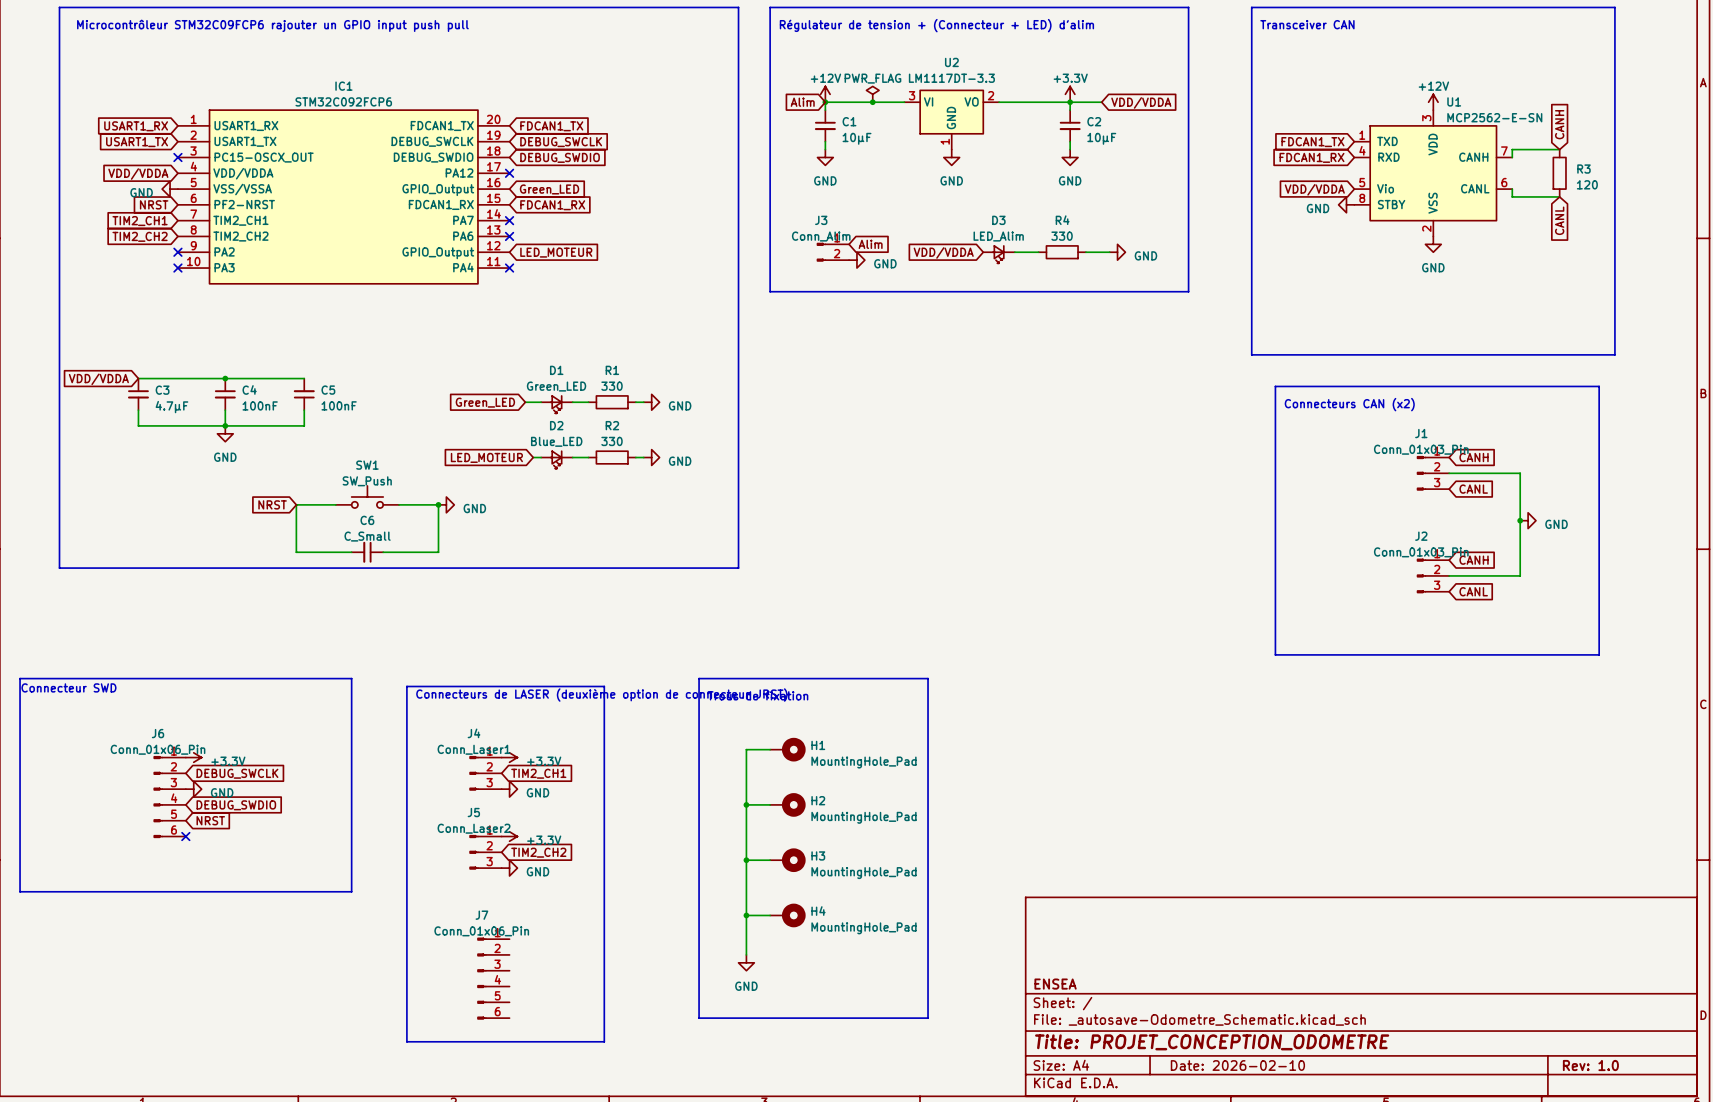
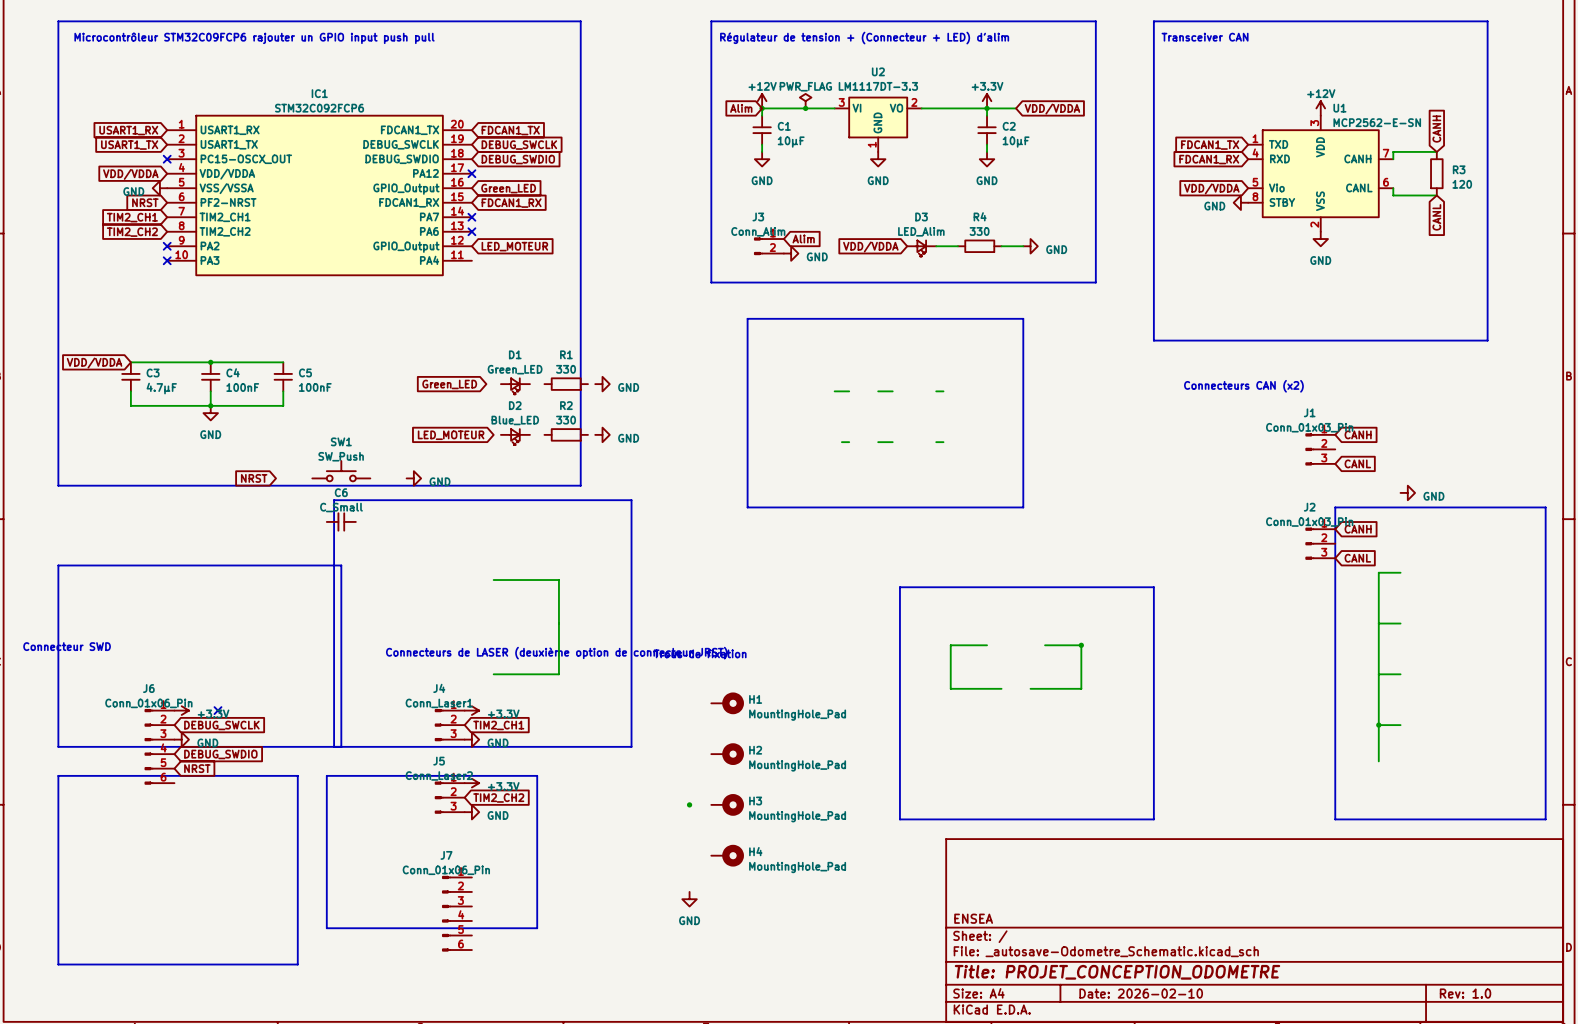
line: (627, 7) (738, 7) (738, 568) (59, 568) (59, 512) -> (580, 21) (580, 485) (58, 485)
no-connect mark: (509, 268) -> none
line: none -> (747, 318) (1023, 318) (1023, 507) (747, 507) (747, 318)
line: (1275, 386) (1599, 386) (1599, 654) (1275, 654) (1275, 386) -> none
wire: (525, 402) (541, 402) -> none
wire: (572, 402) (588, 402) -> none
wire: (635, 402) (643, 402) -> none
wire: none -> (834, 391) (849, 391)
wire: none -> (878, 391) (892, 391)
wire: none -> (936, 391) (943, 391)
wire: (533, 457) (541, 457) -> none
wire: (572, 457) (588, 457) -> none
wire: (635, 457) (643, 457) -> none
wire: none -> (841, 442) (849, 442)
wire: none -> (878, 442) (892, 442)
wire: none -> (936, 442) (943, 442)
wire: (1449, 473) (1520, 473) (1520, 575) (1449, 575) -> none
wire: (335, 504) (296, 504) (296, 552) (351, 552) -> none
wire: (399, 504) (438, 504) (438, 552) (383, 552) -> none
junction: (438, 504) -> none
junction: (1520, 520) -> none
line: none -> (1335, 507) (1545, 507) (1545, 819) (1335, 819) (1335, 507)
wire: none -> (1400, 572) (1378, 572) (1378, 761)
wire: none -> (493, 580) (558, 580) (558, 674) (493, 674)
line: none -> (899, 587) (1153, 587) (1153, 819) (899, 819) (899, 587)
wire: none -> (1378, 623) (1400, 623)
line: (699, 678) (928, 678) (928, 1018) (699, 1018) (699, 678) -> none
line: (406, 686) (604, 686) (604, 1041) (406, 1041) (406, 686) -> none
wire: none -> (987, 645) (950, 645) (950, 688) (1001, 688)
wire: none -> (1045, 645) (1081, 645) (1081, 688) (1030, 688)
junction: none -> (1081, 645)
wire: none -> (1378, 674) (1400, 674)
wire: (770, 749) (746, 749) (746, 954) -> none
no-connect mark: none -> (217, 710)
wire: none -> (1378, 725) (1400, 725)
junction: none -> (1378, 725)
line: none -> (334, 746) (334, 500) (631, 500) (631, 746) (58, 746) (58, 565) (341, 565) (341, 746)
wire: (746, 804) (770, 804) -> none
junction: (746, 804) -> none
line: none -> (58, 775) (58, 964) (297, 964) (297, 775) (58, 775)
line: (351, 828) (351, 678) (20, 678) (20, 891) (351, 891) -> (326, 775) (537, 775) (537, 928) (326, 928) (326, 833)
no-connect mark: (185, 836) -> none
wire: (746, 860) (770, 860) -> none
wire: (746, 915) (770, 915) -> none
junction: (746, 915) -> none

